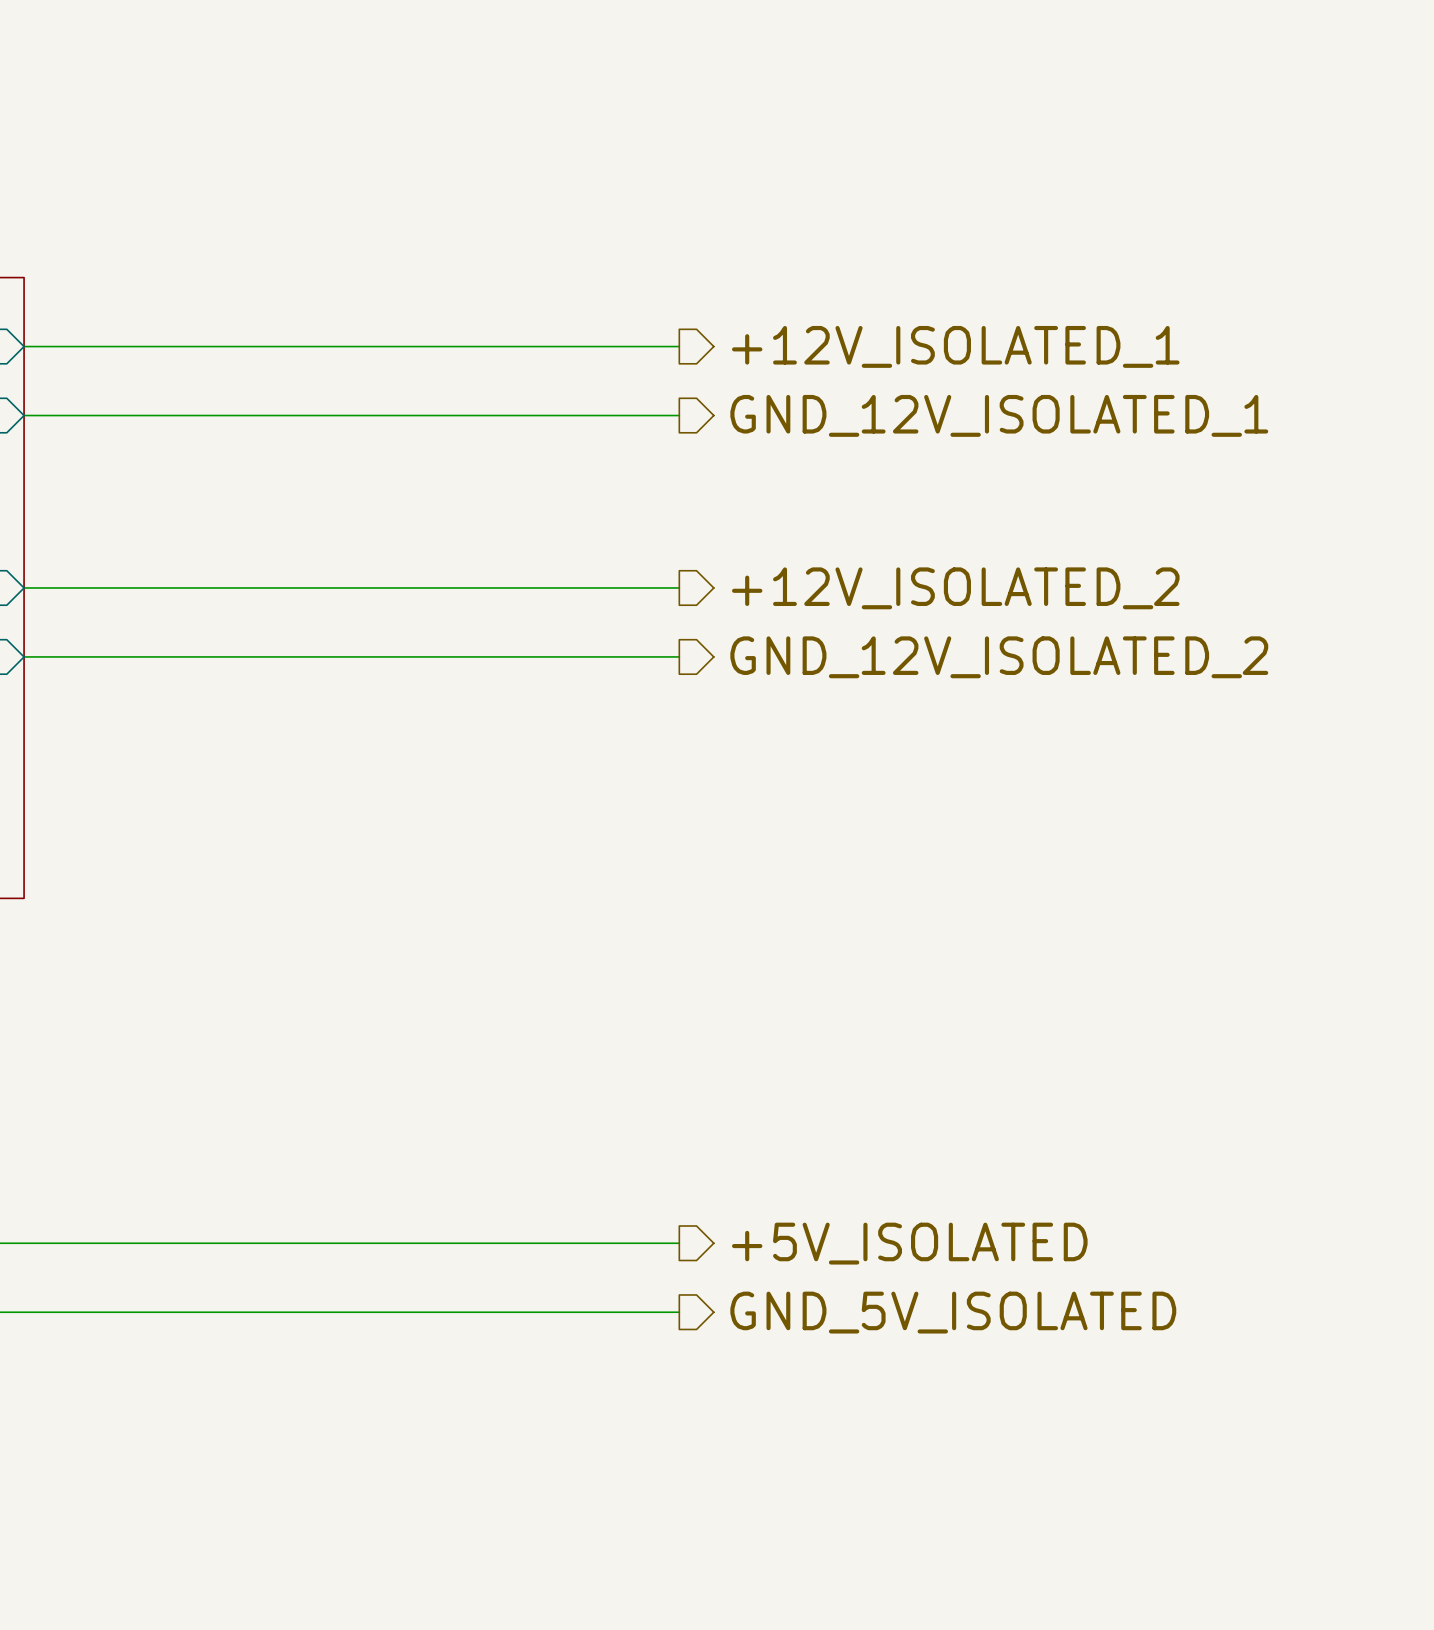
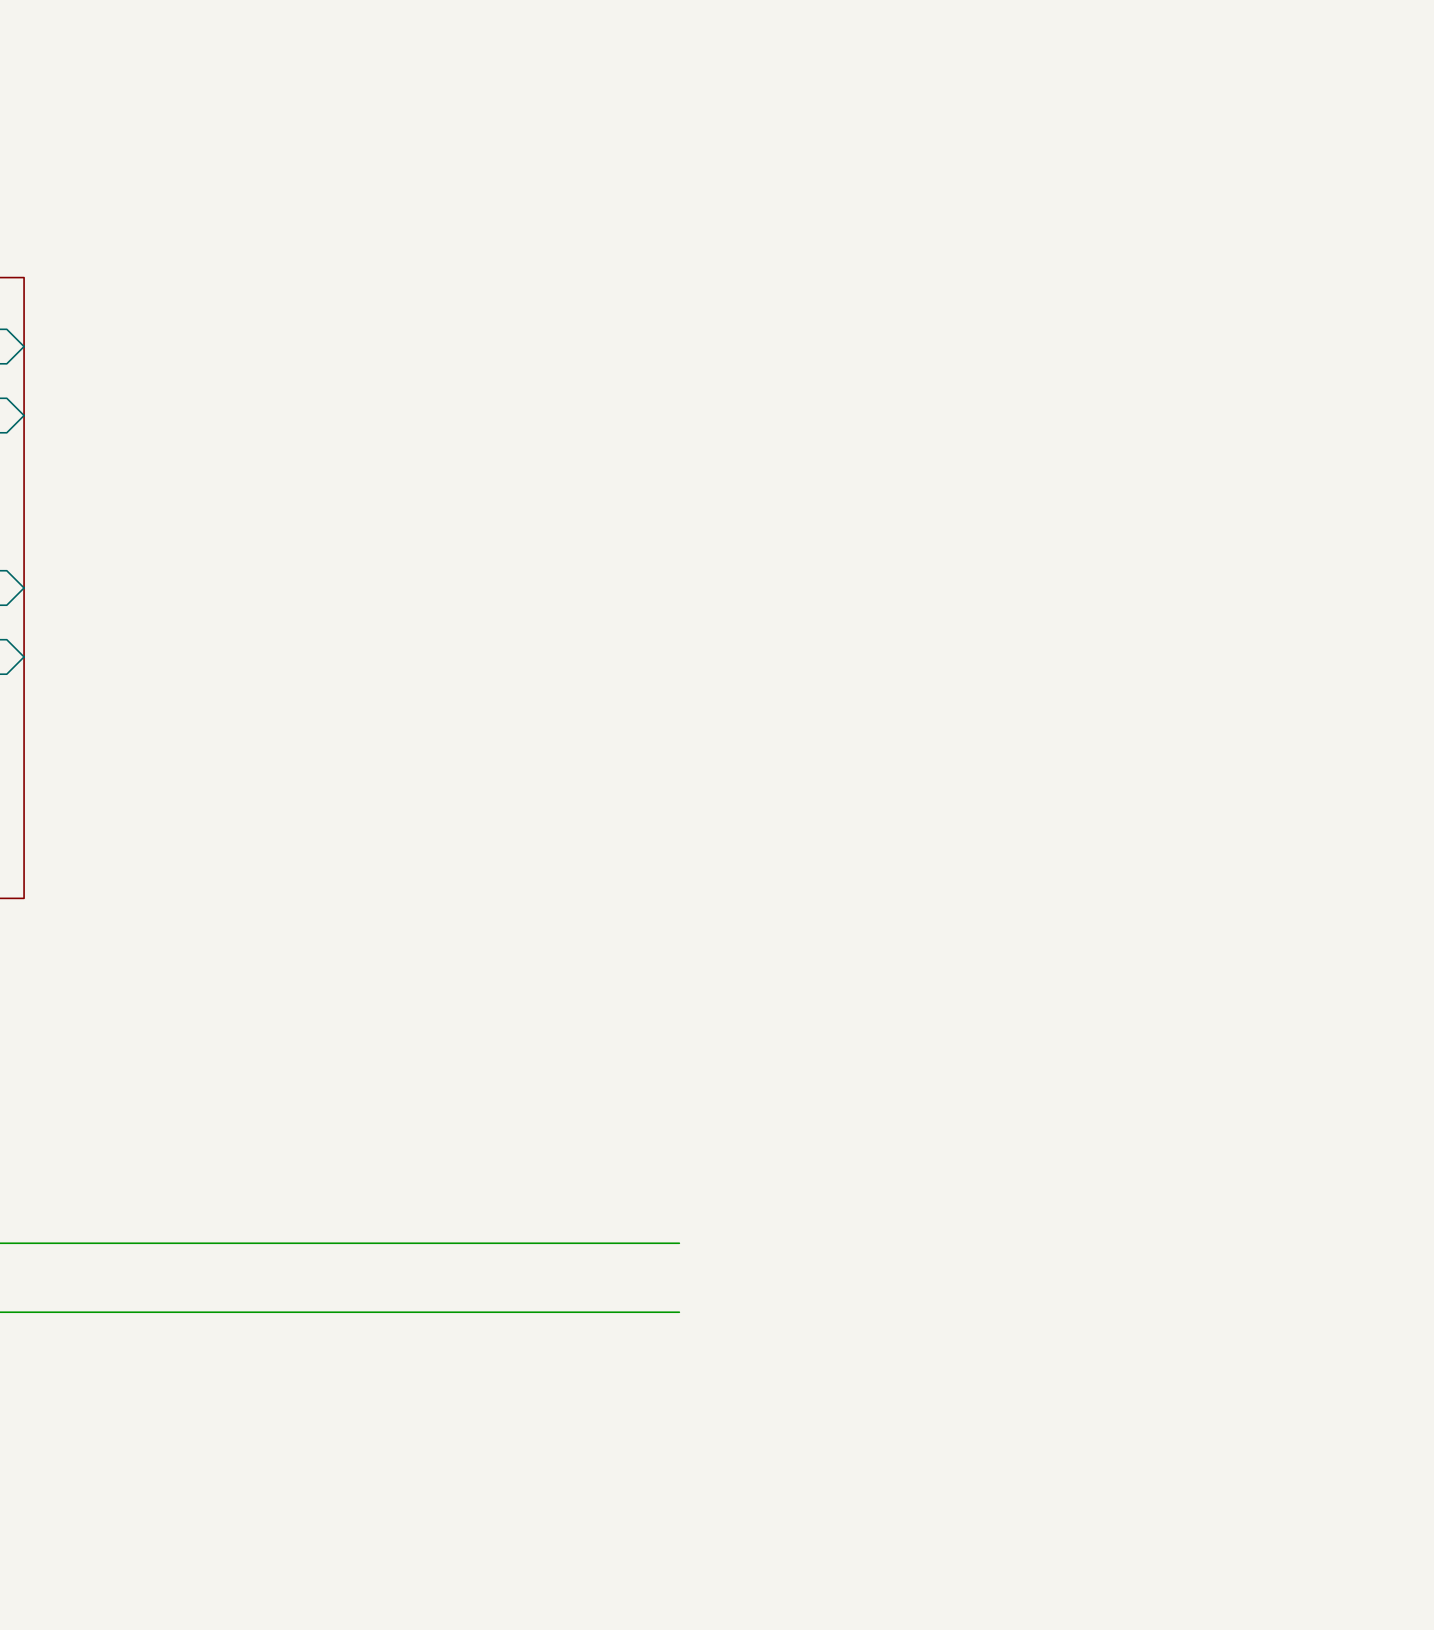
wire: (24, 346) (679, 346) -> none
hierarchical label: +12V_ISOLATED_1 (955, 346) -> none
wire: (24, 415) (679, 415) -> none
hierarchical label: GND_12V_ISOLATED_1 (999, 415) -> none
wire: (24, 587) (679, 587) -> none
hierarchical label: +12V_ISOLATED_2 (955, 588) -> none
wire: (24, 656) (679, 656) -> none
hierarchical label: GND_12V_ISOLATED_2 (999, 657) -> none
hierarchical label: +5V_ISOLATED (909, 1243) -> none
hierarchical label: GND_5V_ISOLATED (953, 1312) -> none

